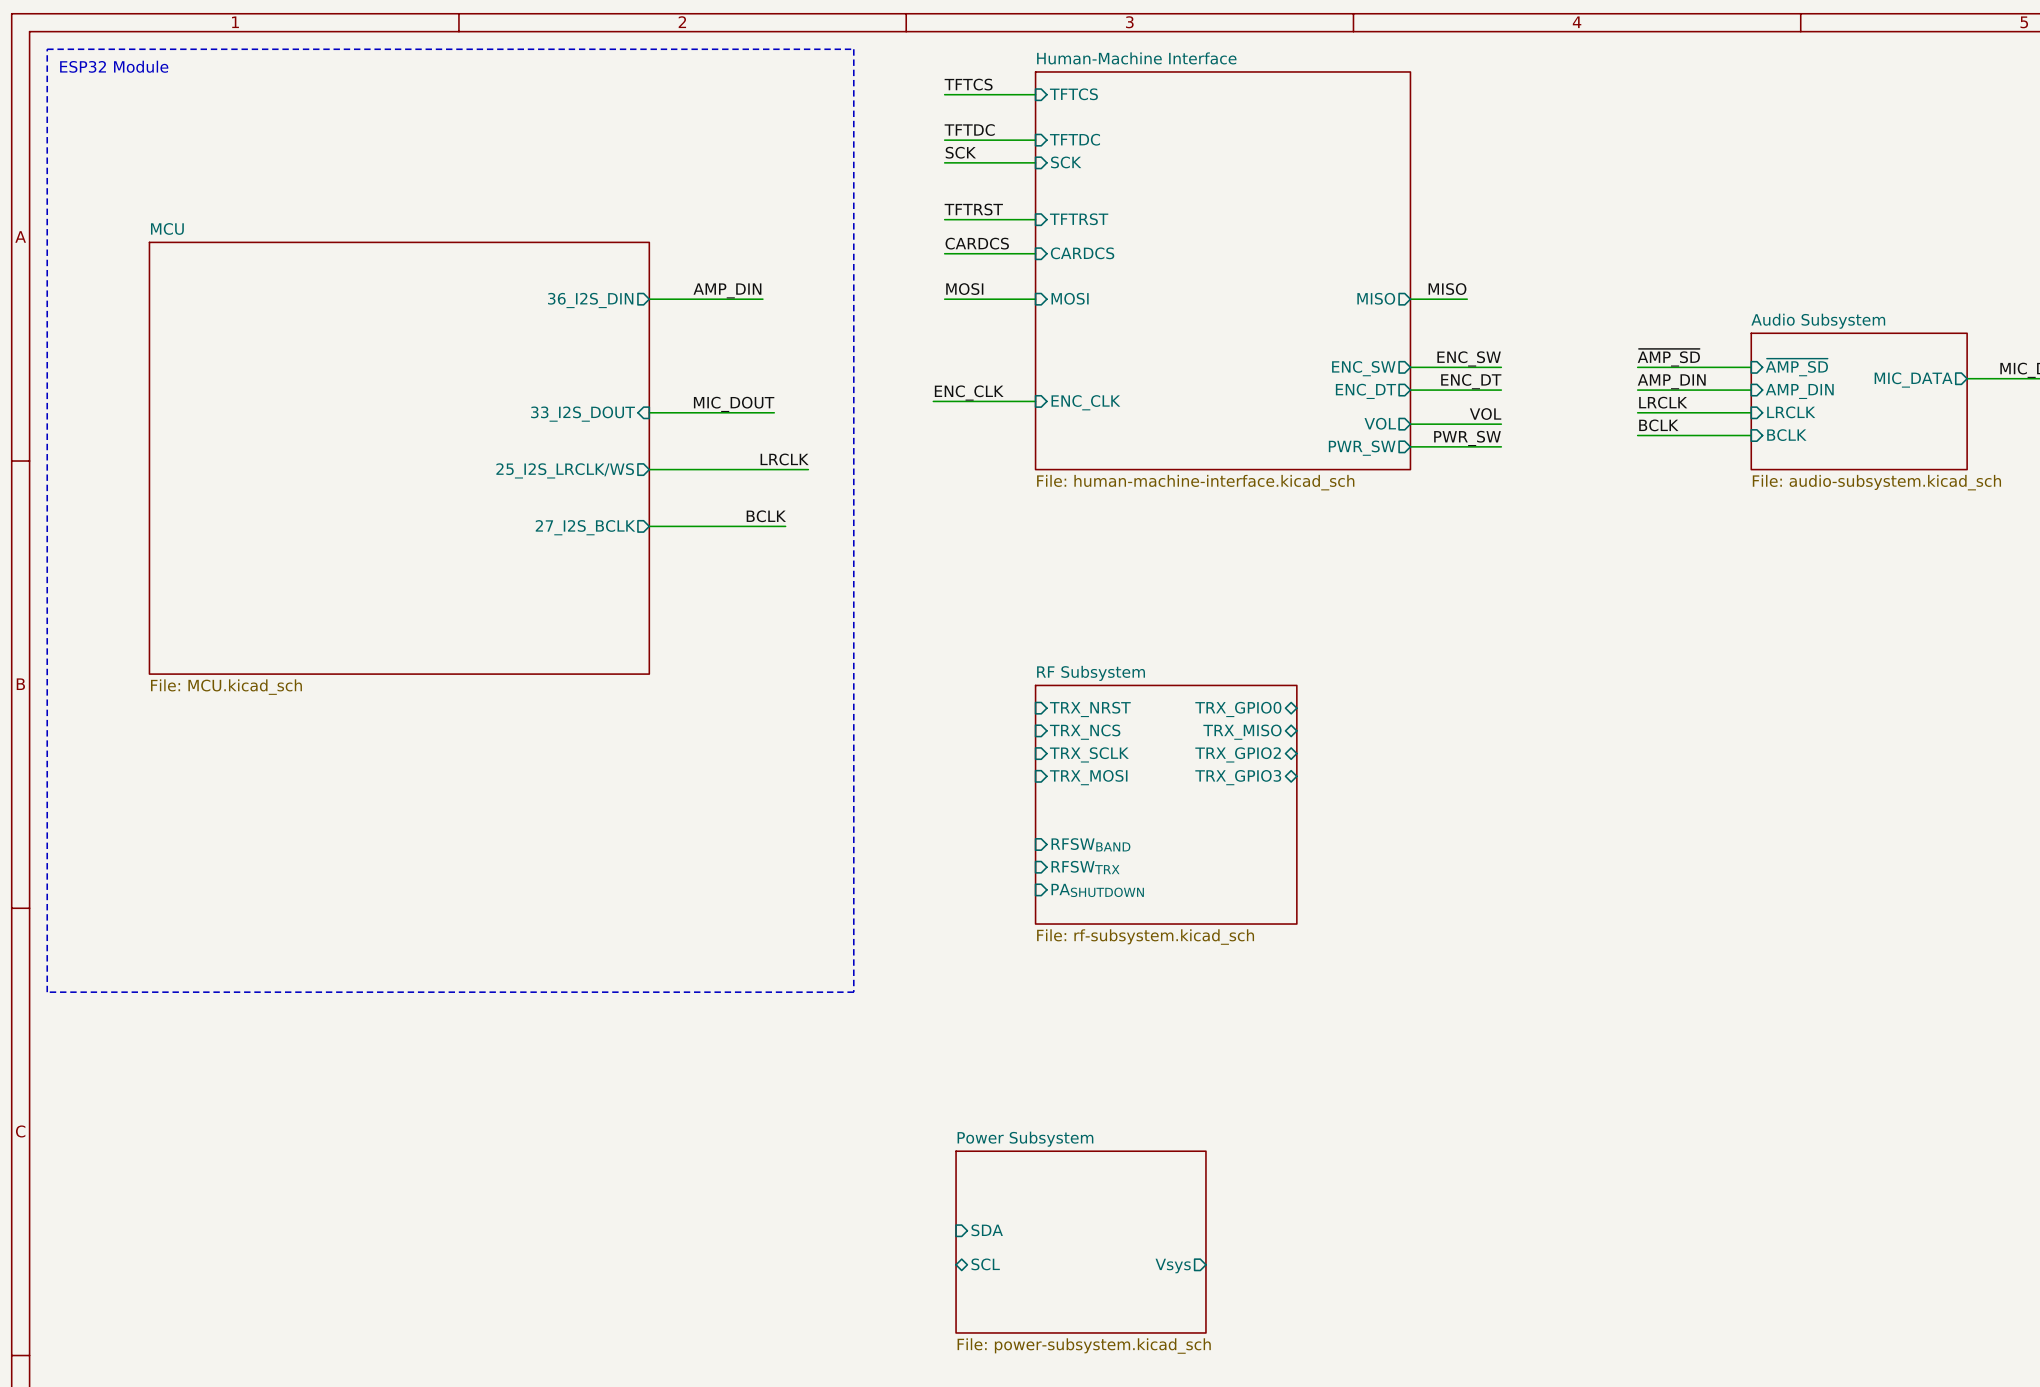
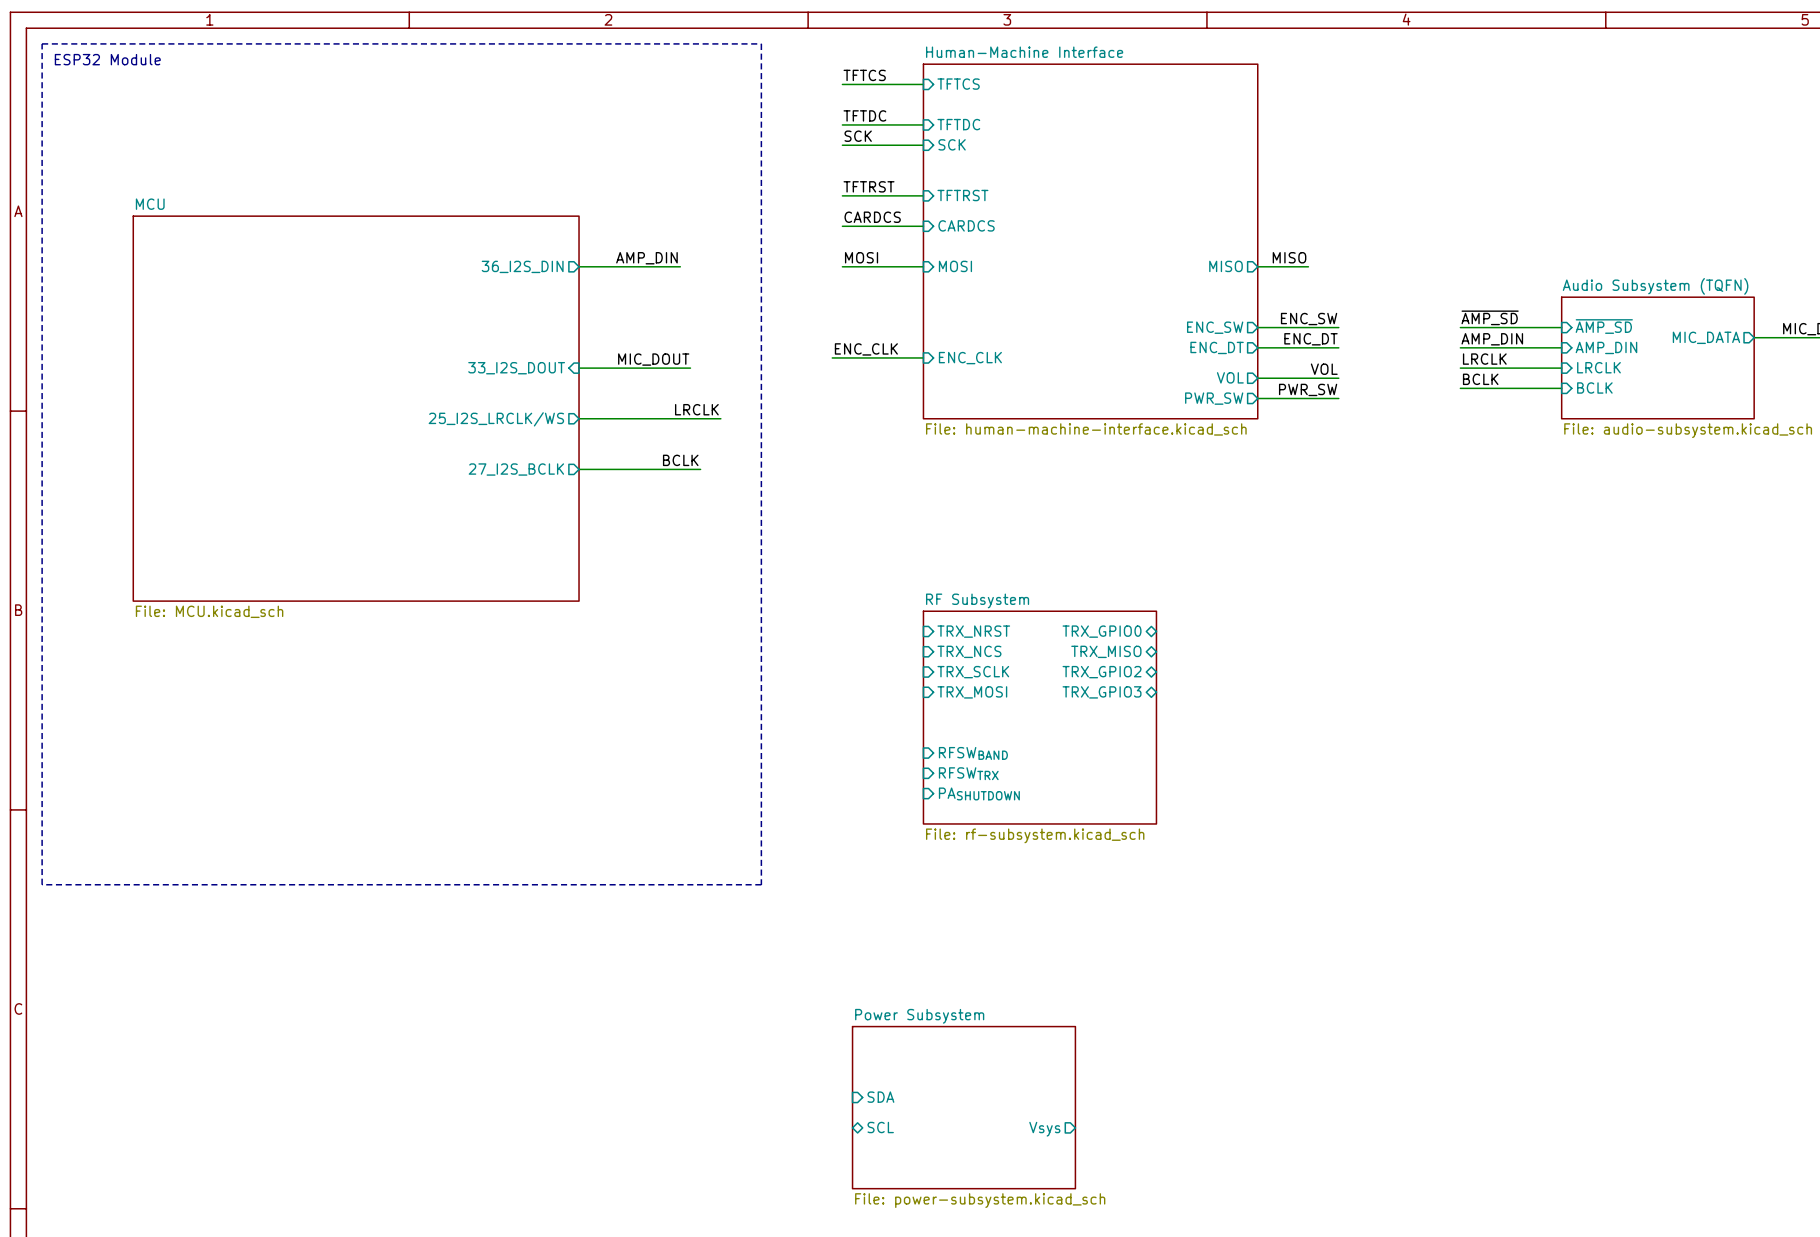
sheet Audio Subsystem name: Audio Subsystem (1818, 321) -> Audio Subsystem (TQFN) (1655, 286)

